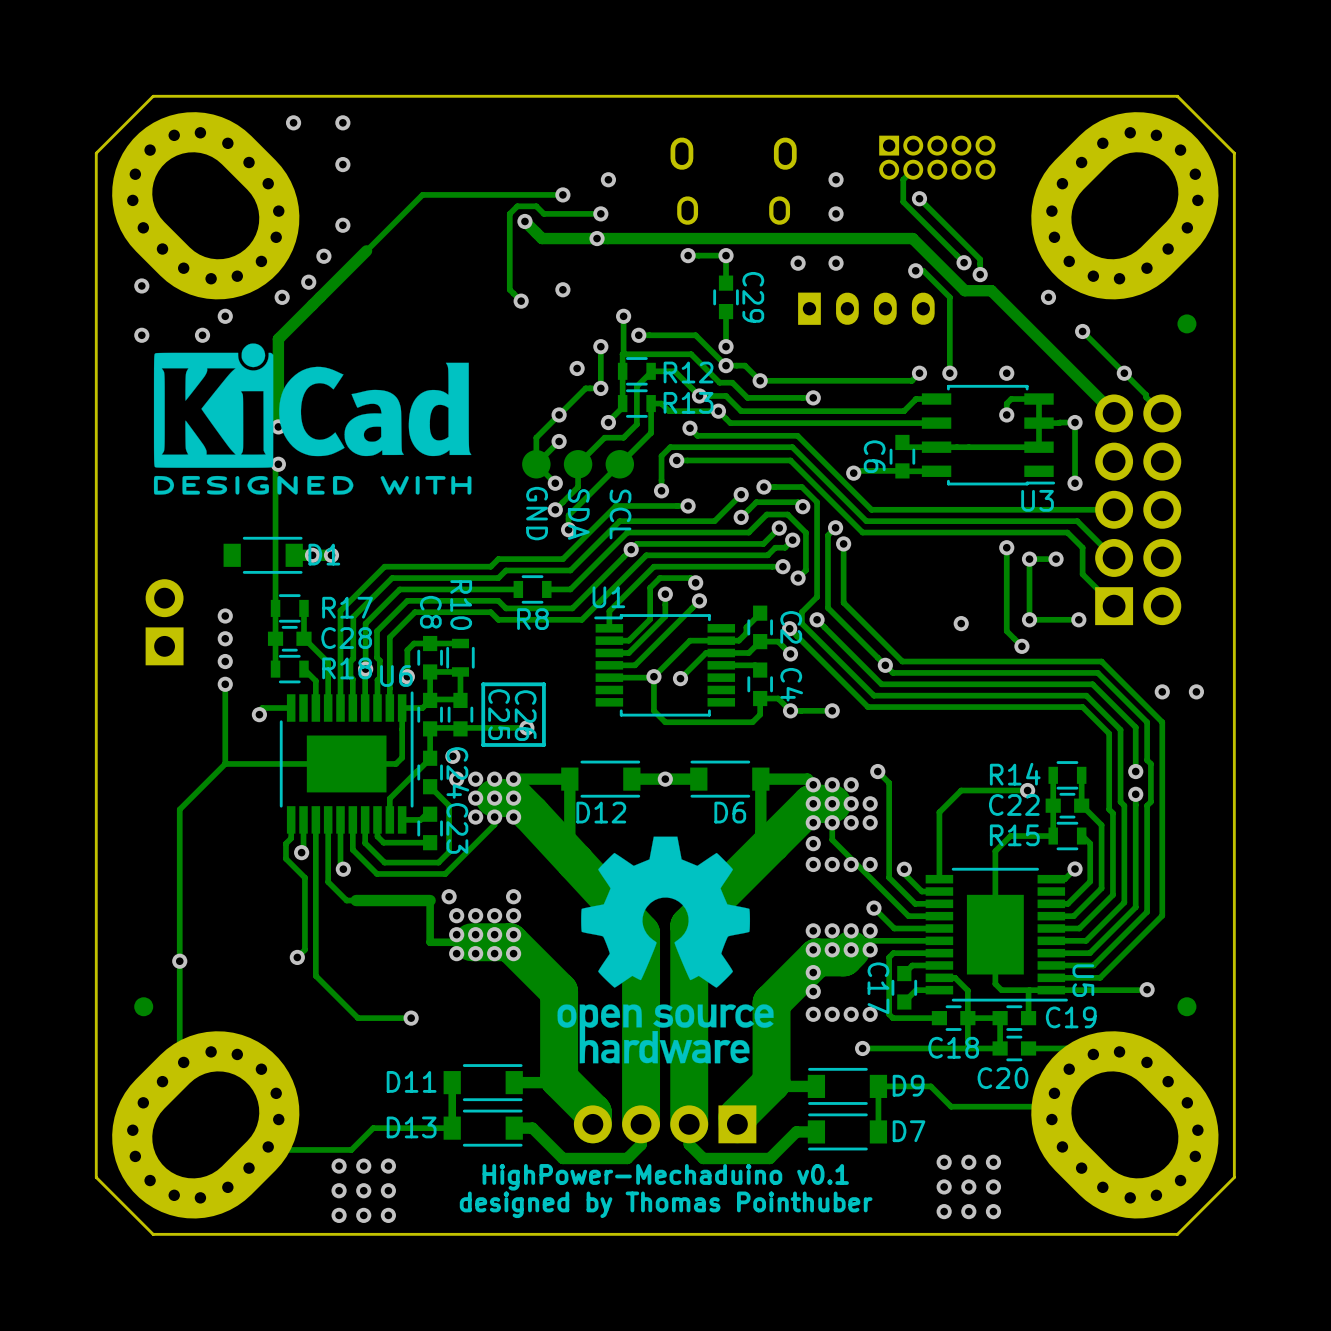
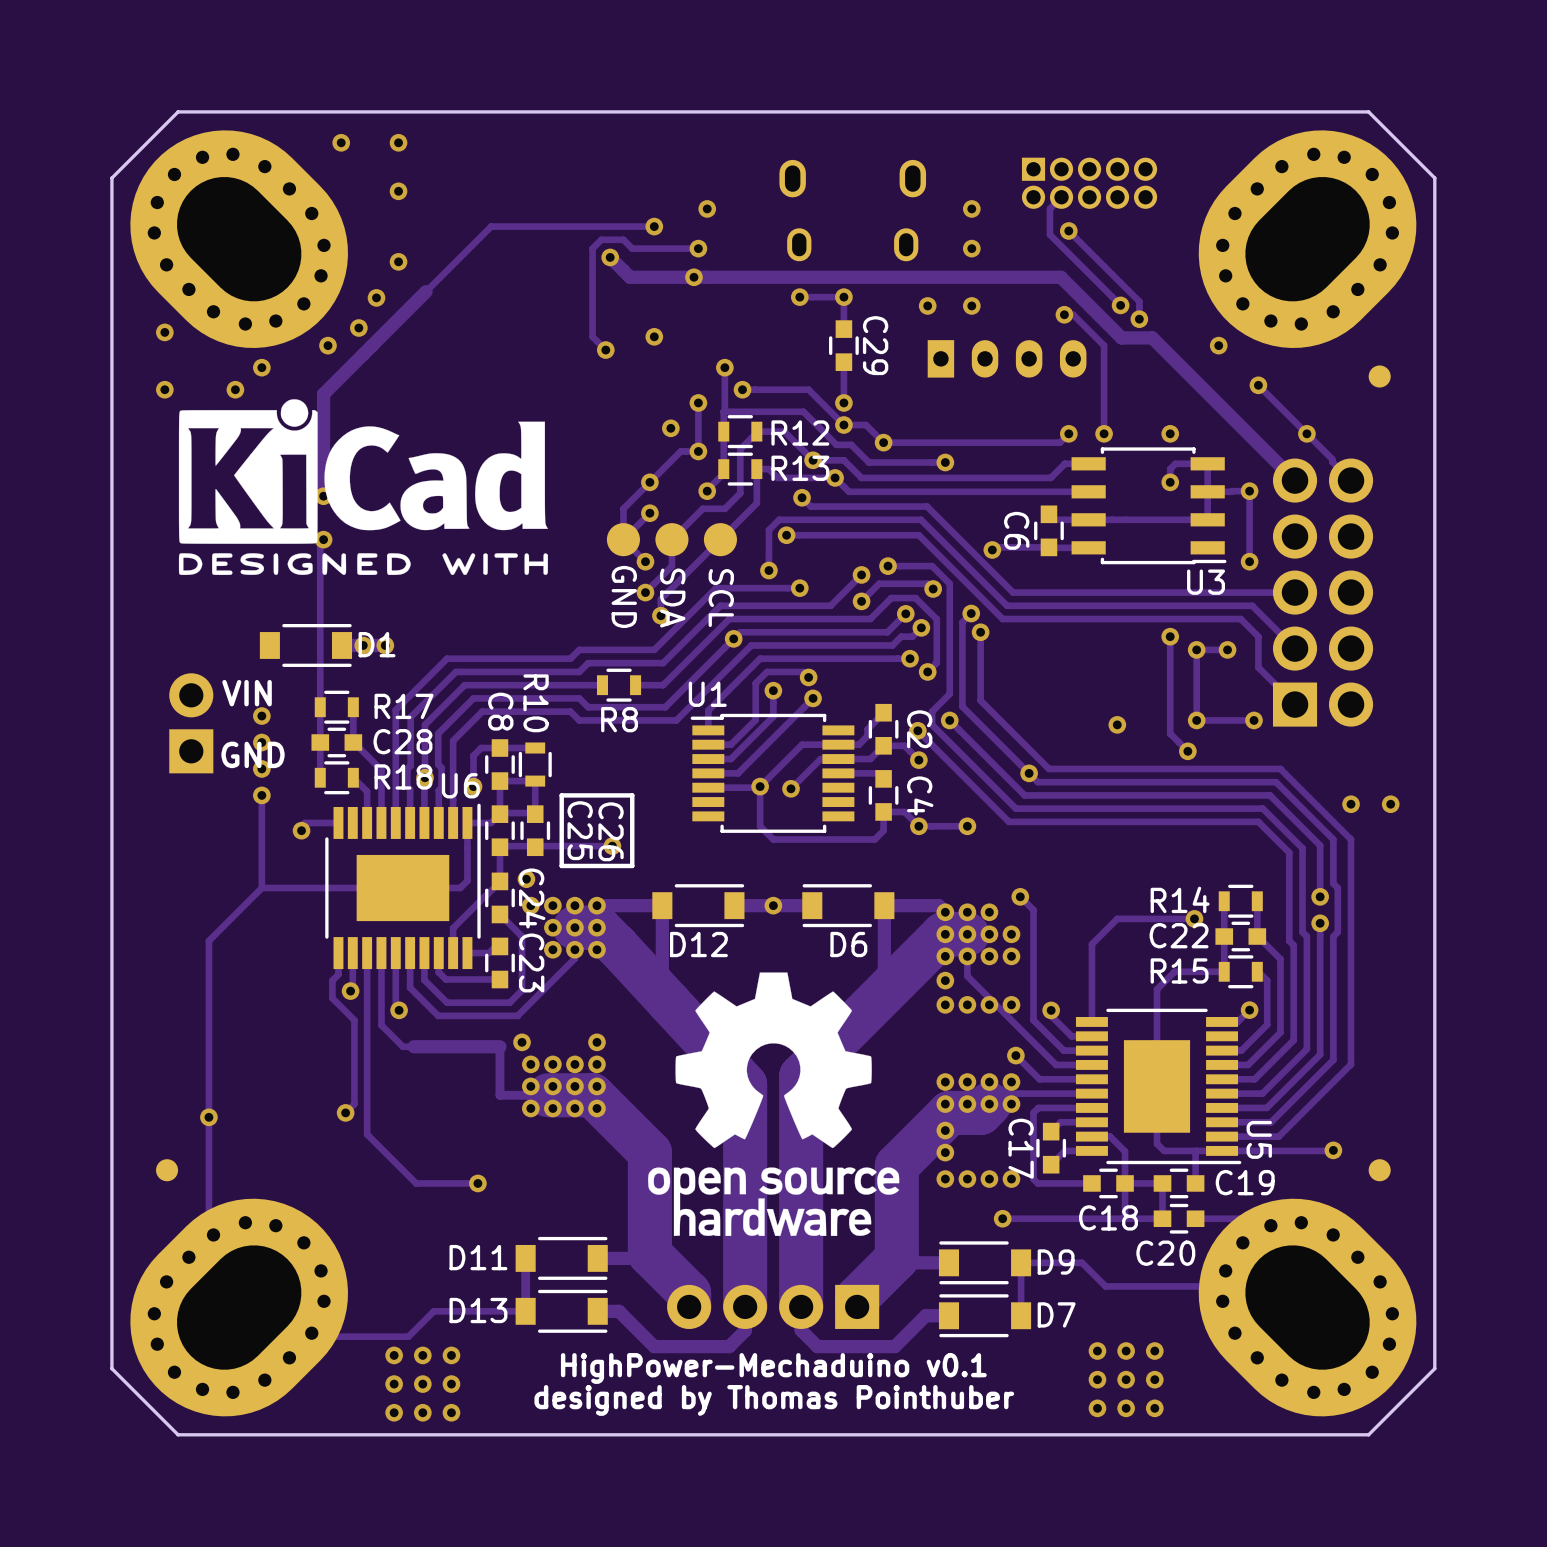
text: none -> VIN (247, 693)
text: none -> GND (253, 754)

